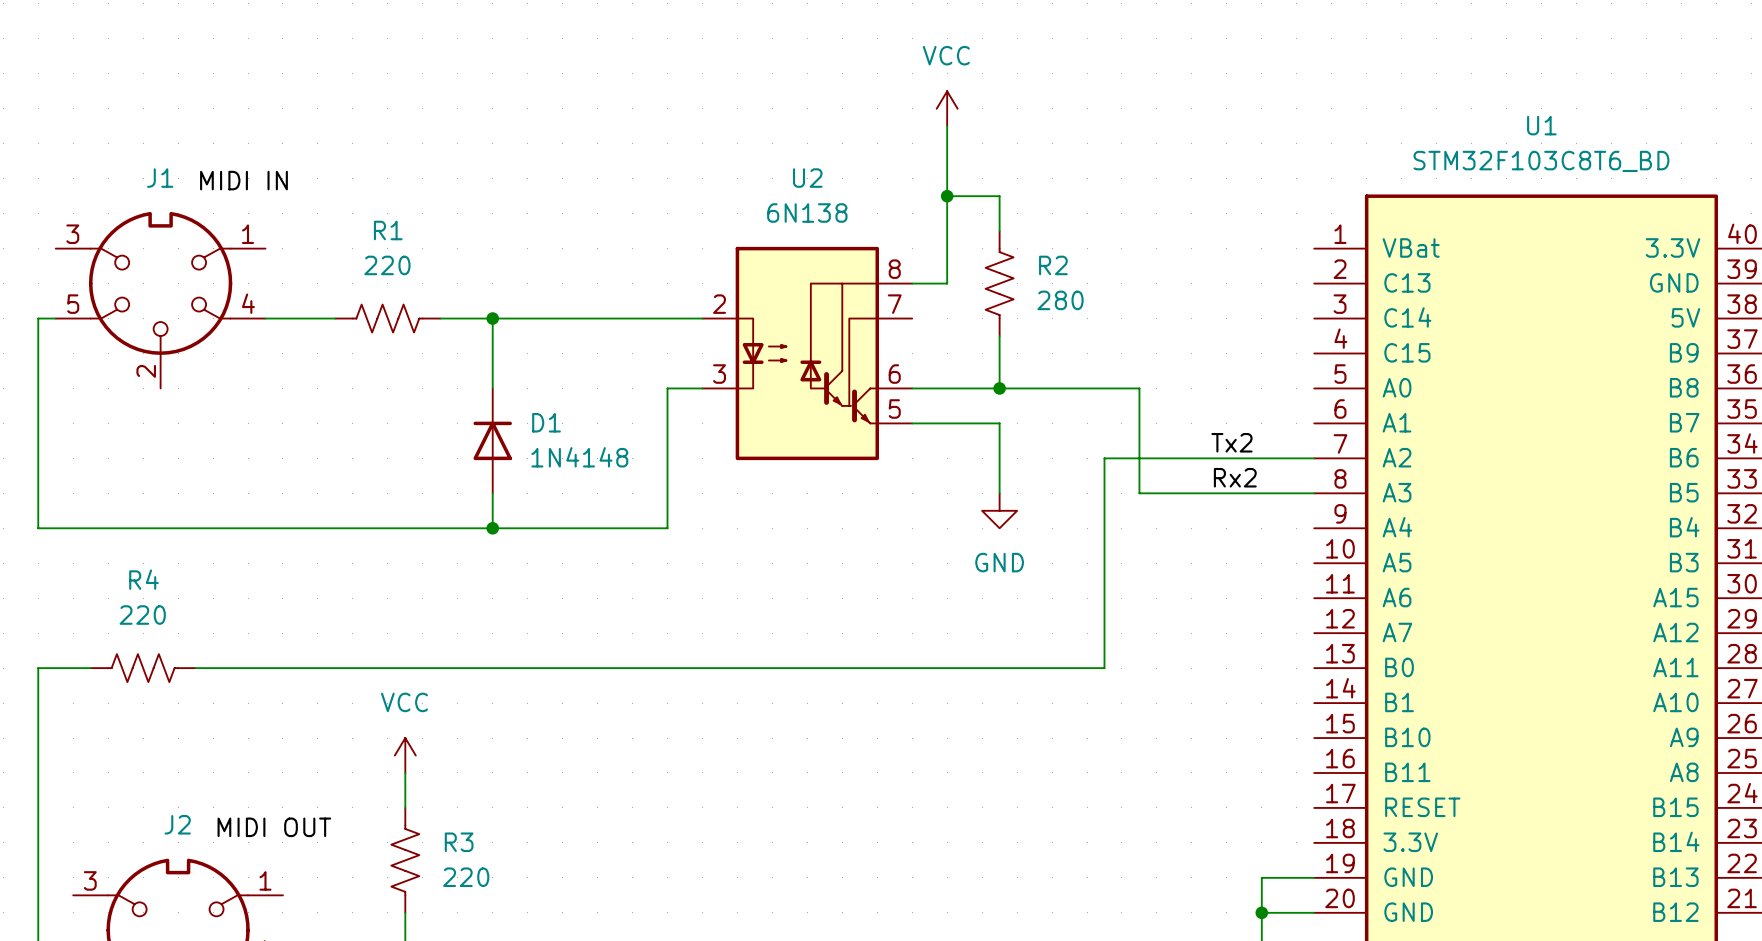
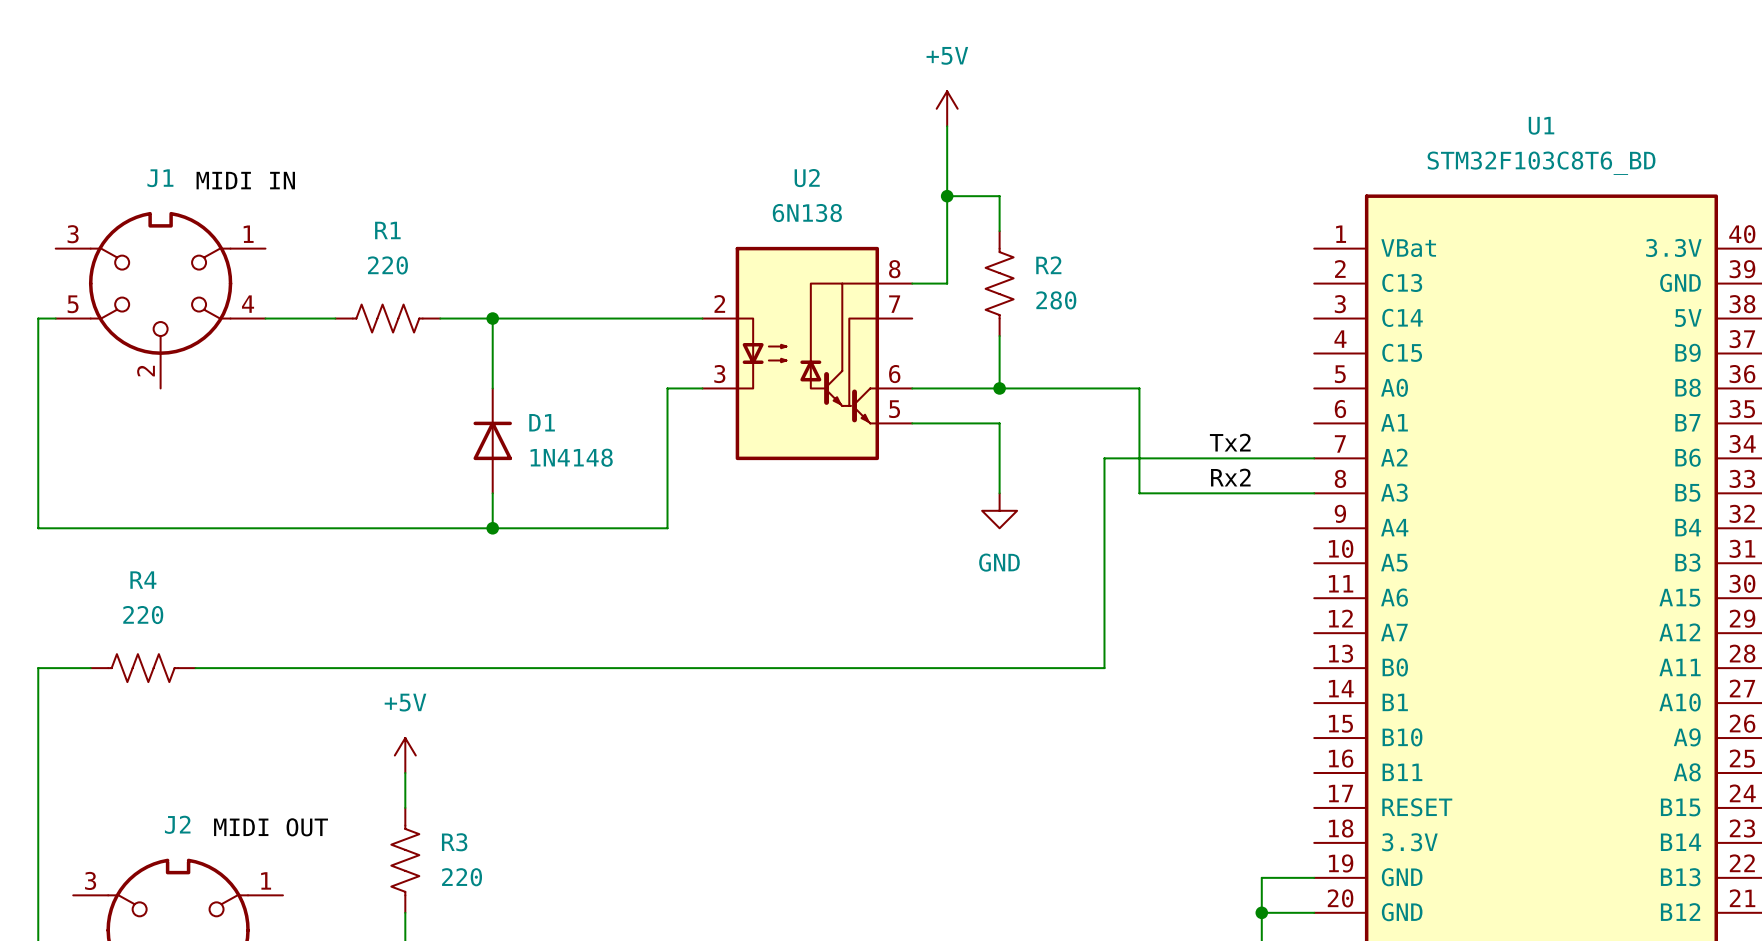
power symbol: VCC (947, 108) -> +5V (947, 108)
power symbol: VCC (405, 755) -> +5V (405, 755)

